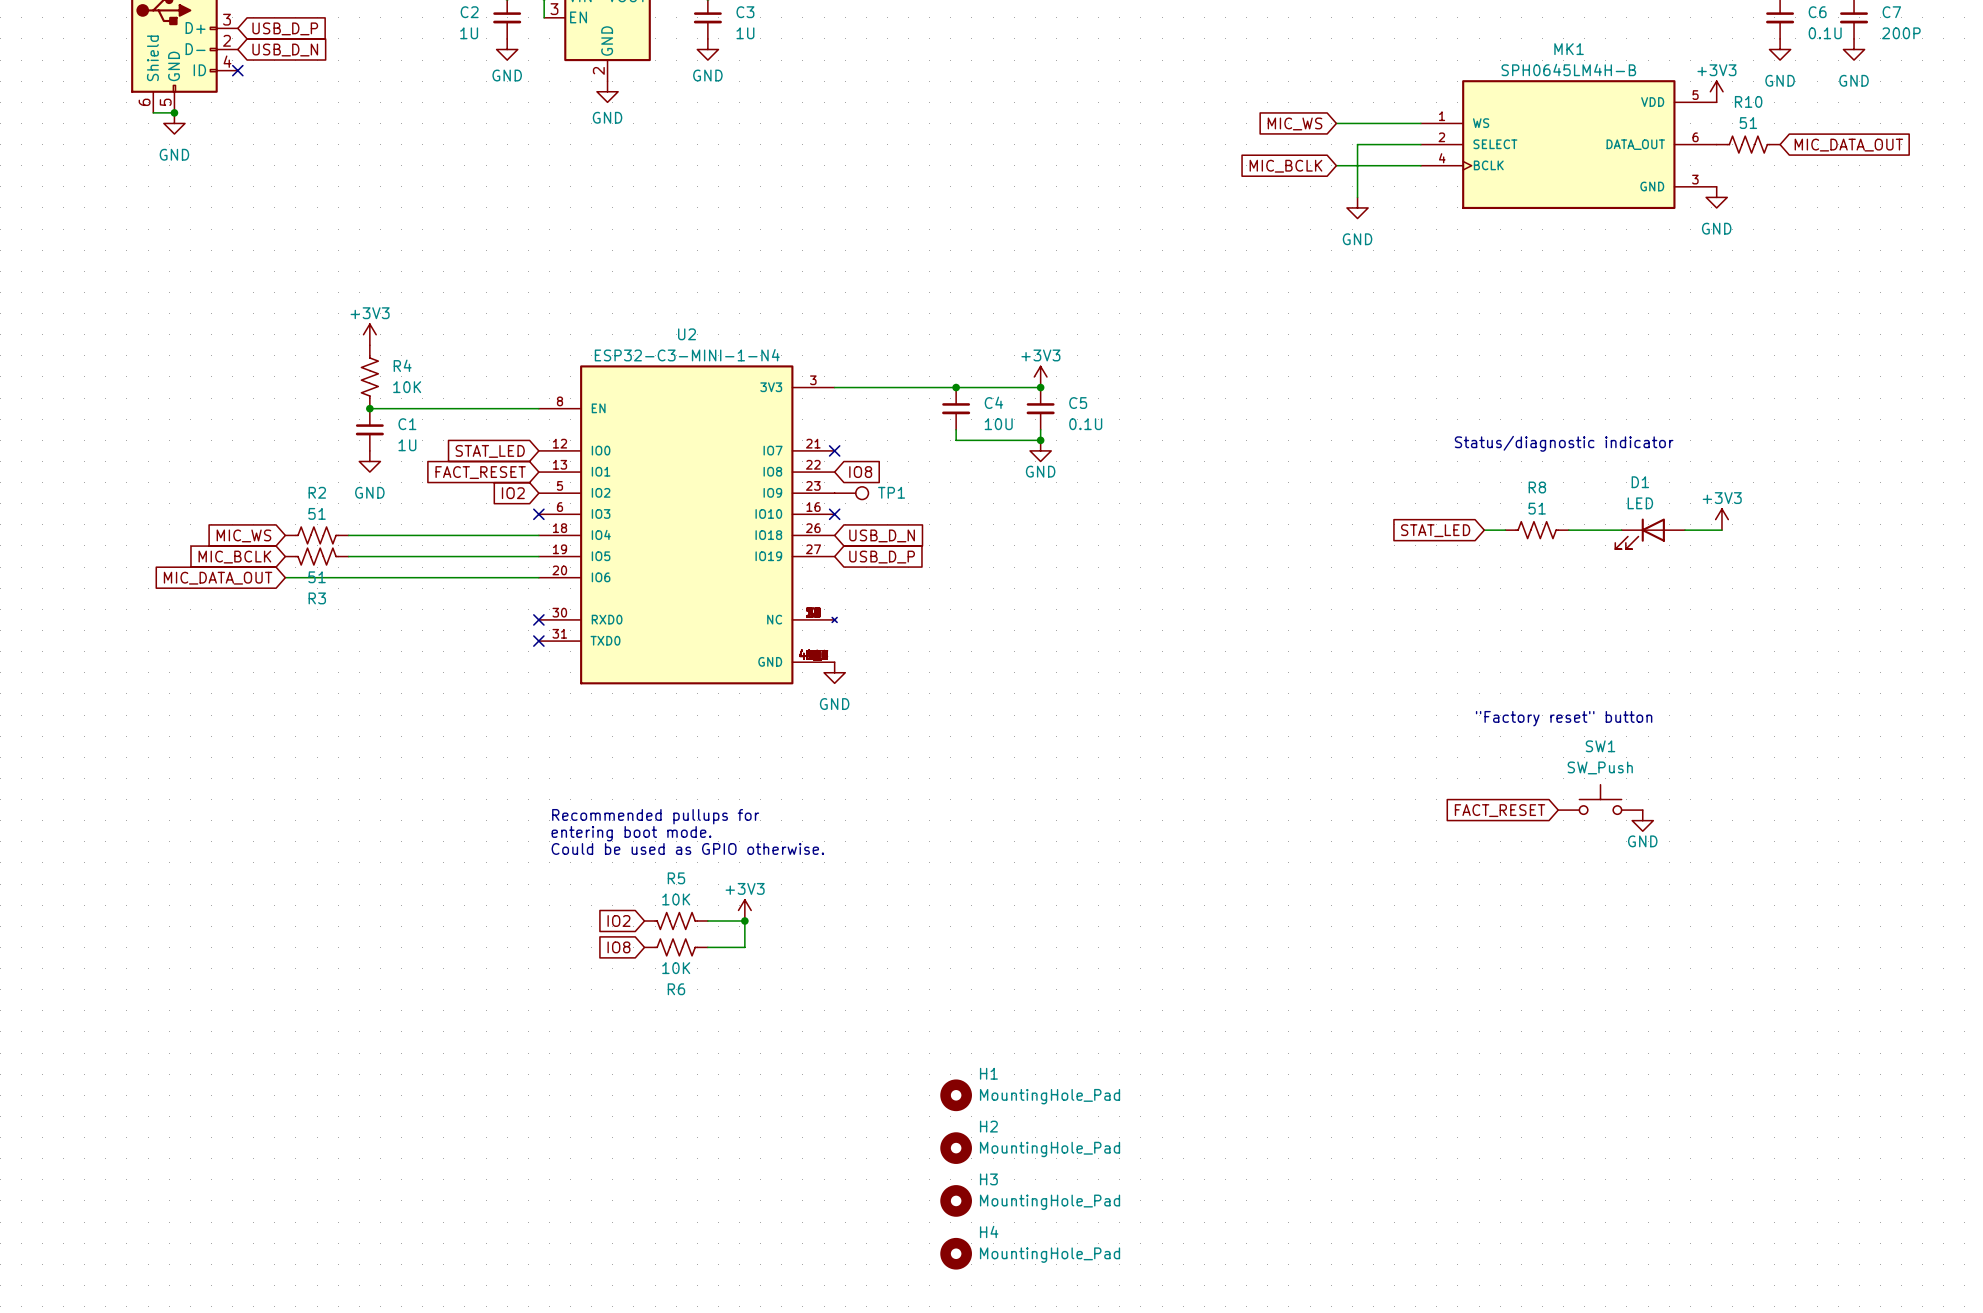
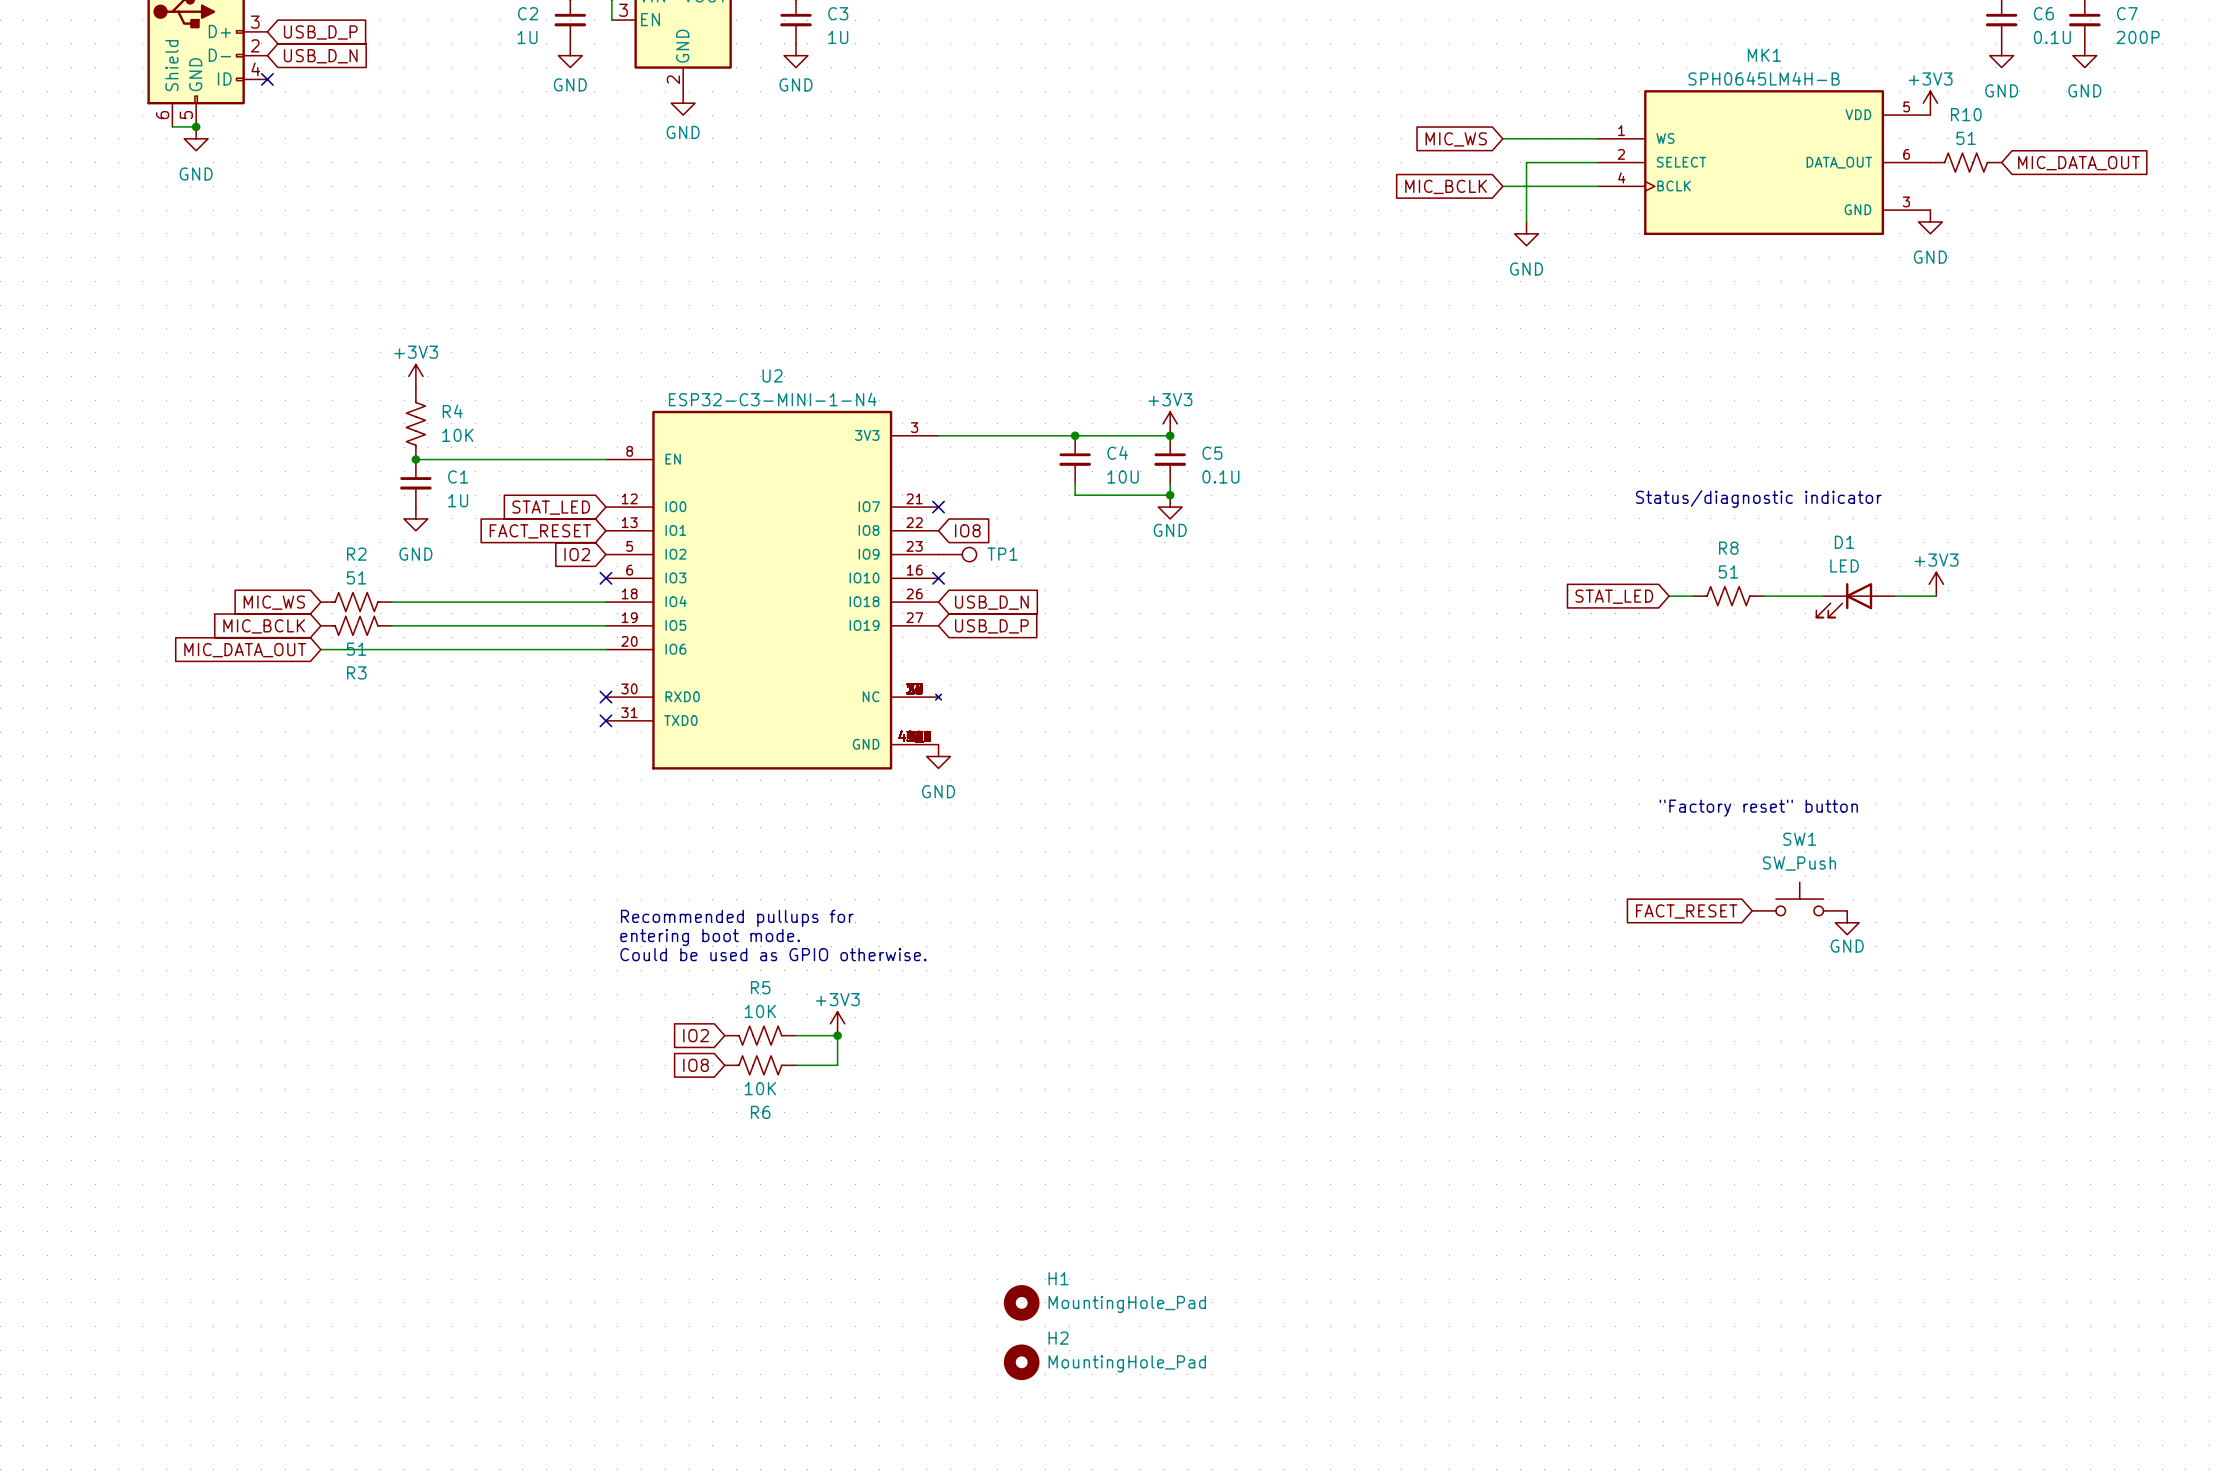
H1 position: (956, 1095) -> (1021, 1302)
H2 position: (956, 1148) -> (1021, 1362)
H3: MountingHole_Pad (956, 1200) -> none
H4: MountingHole_Pad (956, 1253) -> none

